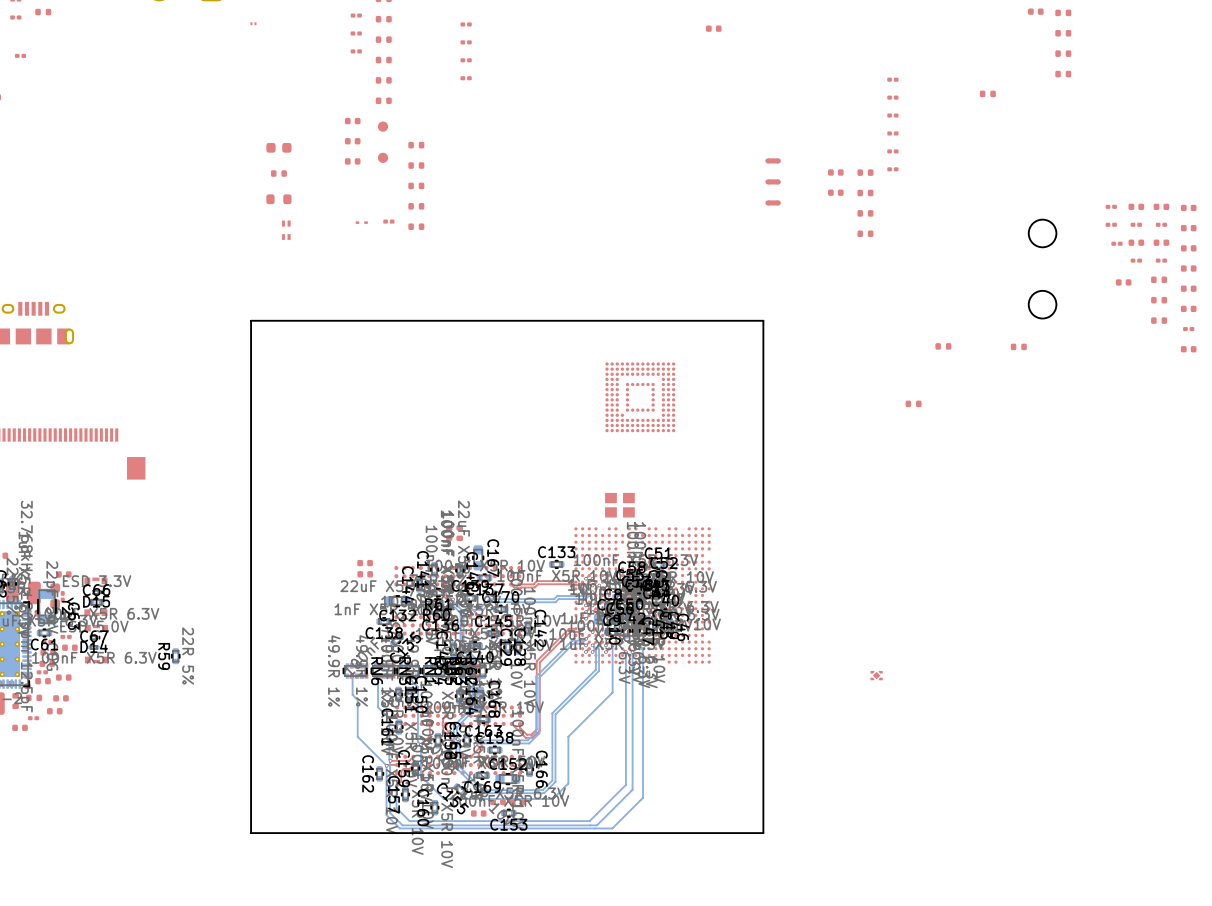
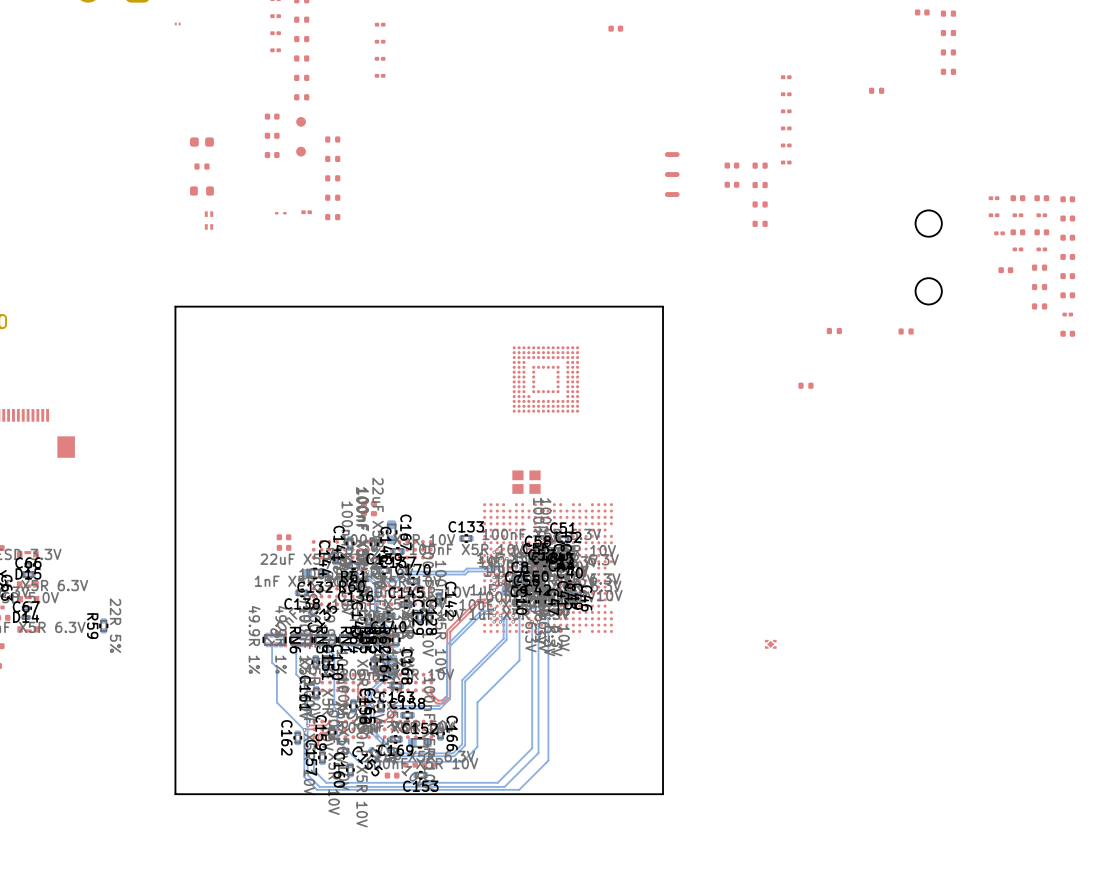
top track: (575, 582) (536, 581) (533, 584) (519, 584) -> none
top track: (582, 582) (579, 585) (538, 584) (534, 587) (520, 587) (514, 587) (511, 584) -> none

